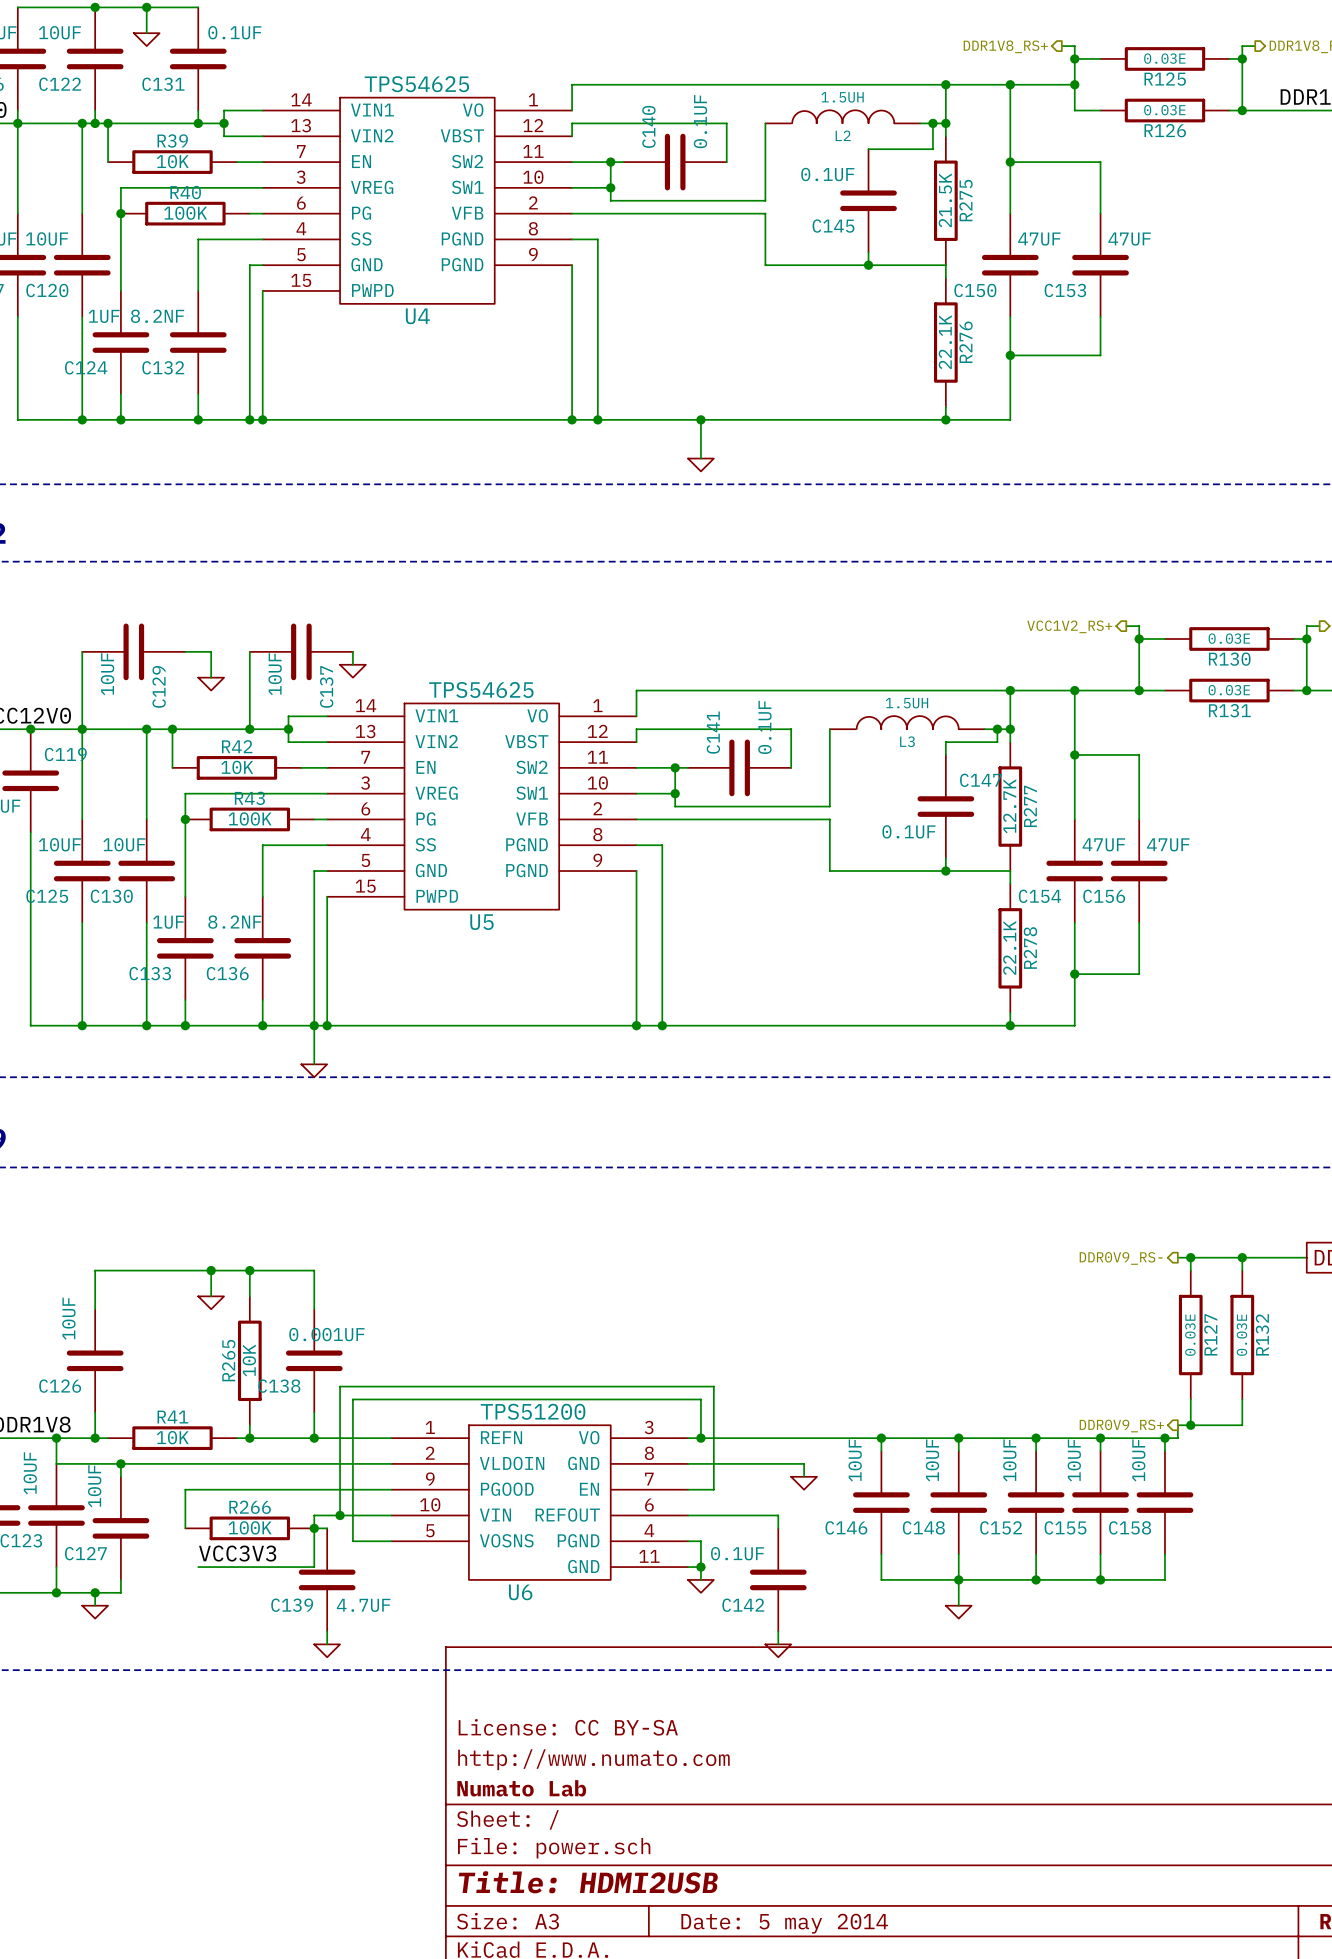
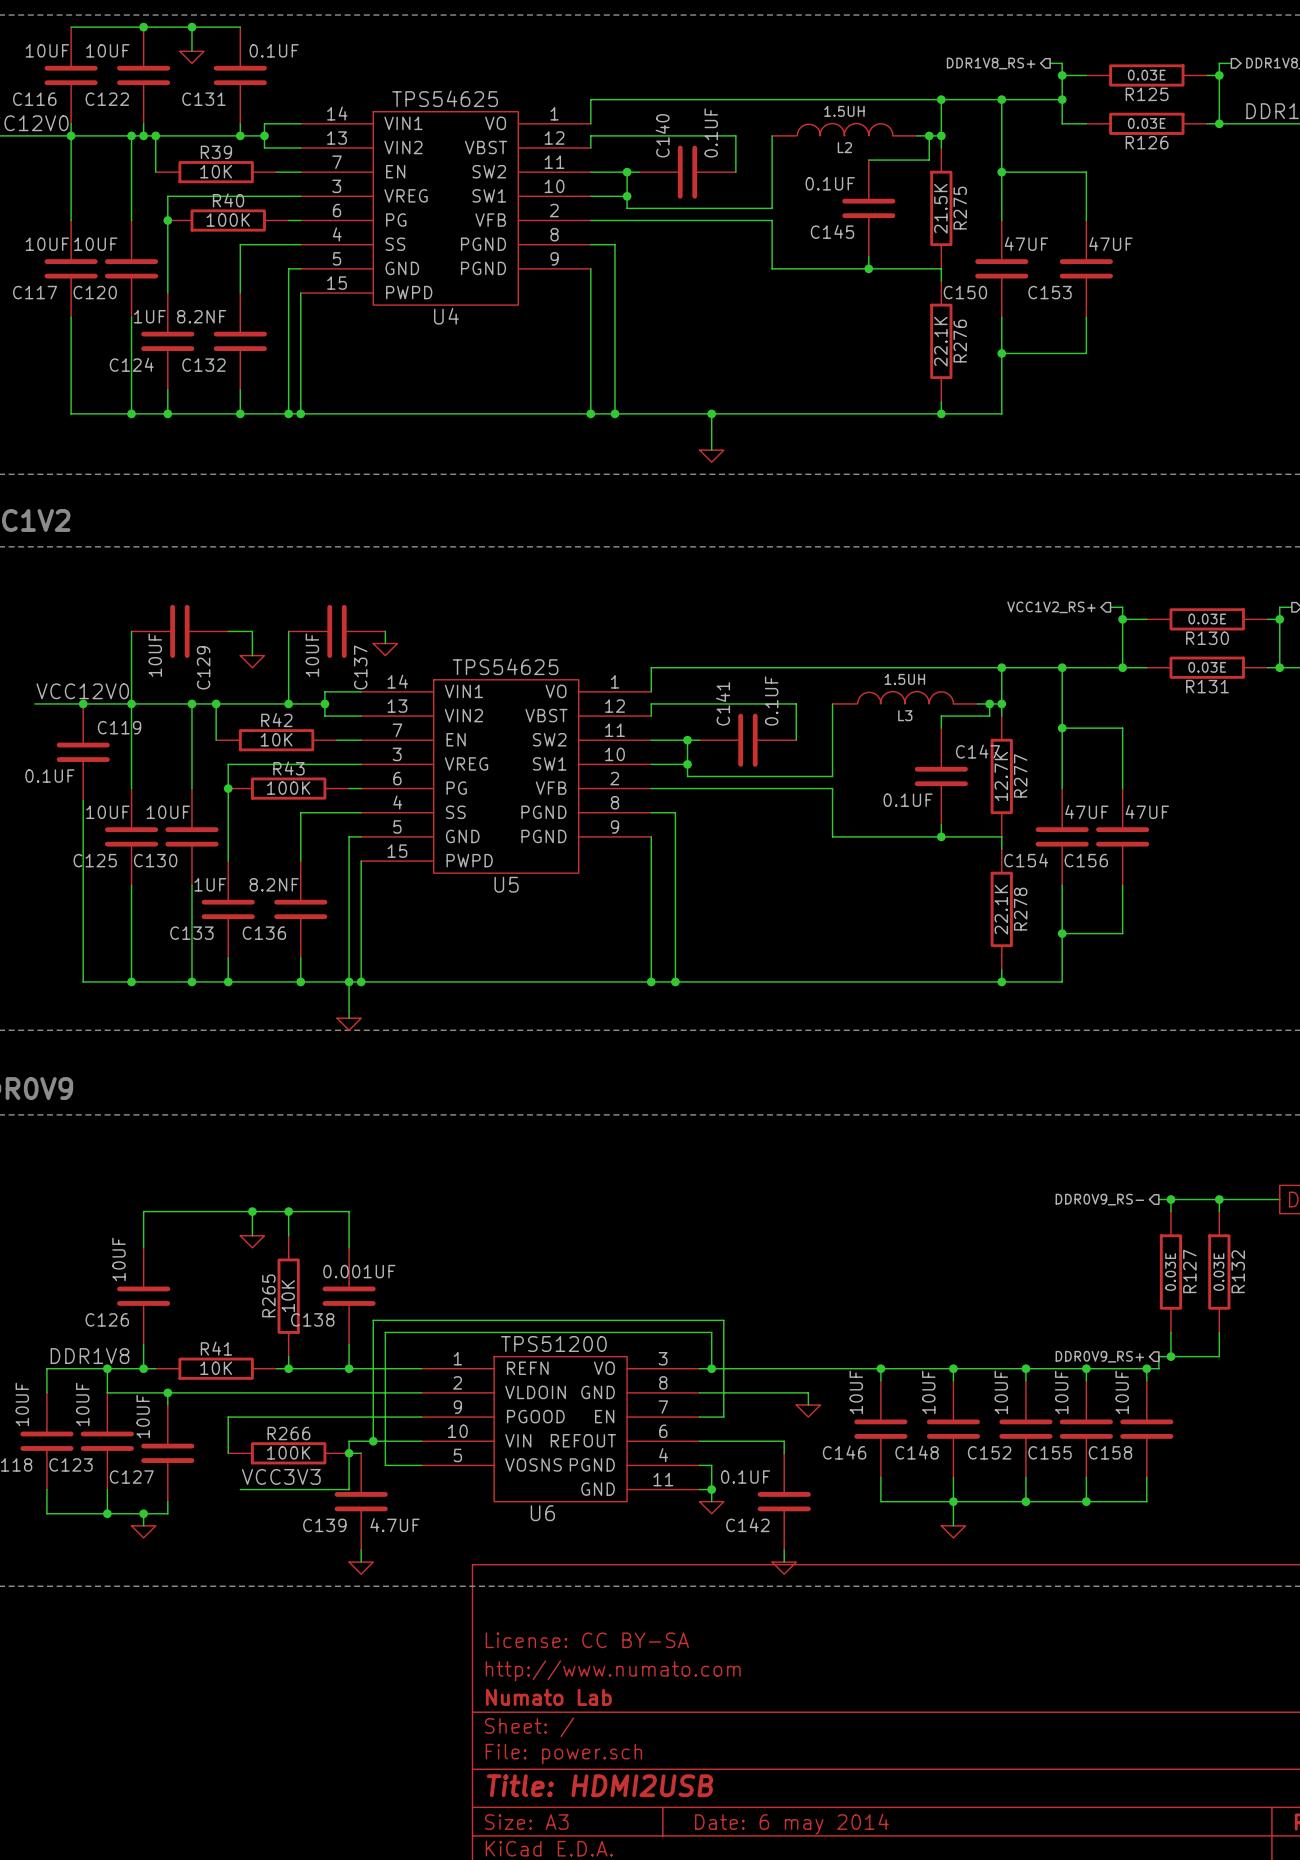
title block: Date: 5 may 2014 (784, 1923) -> Date: 6 may 2014 (791, 1824)

